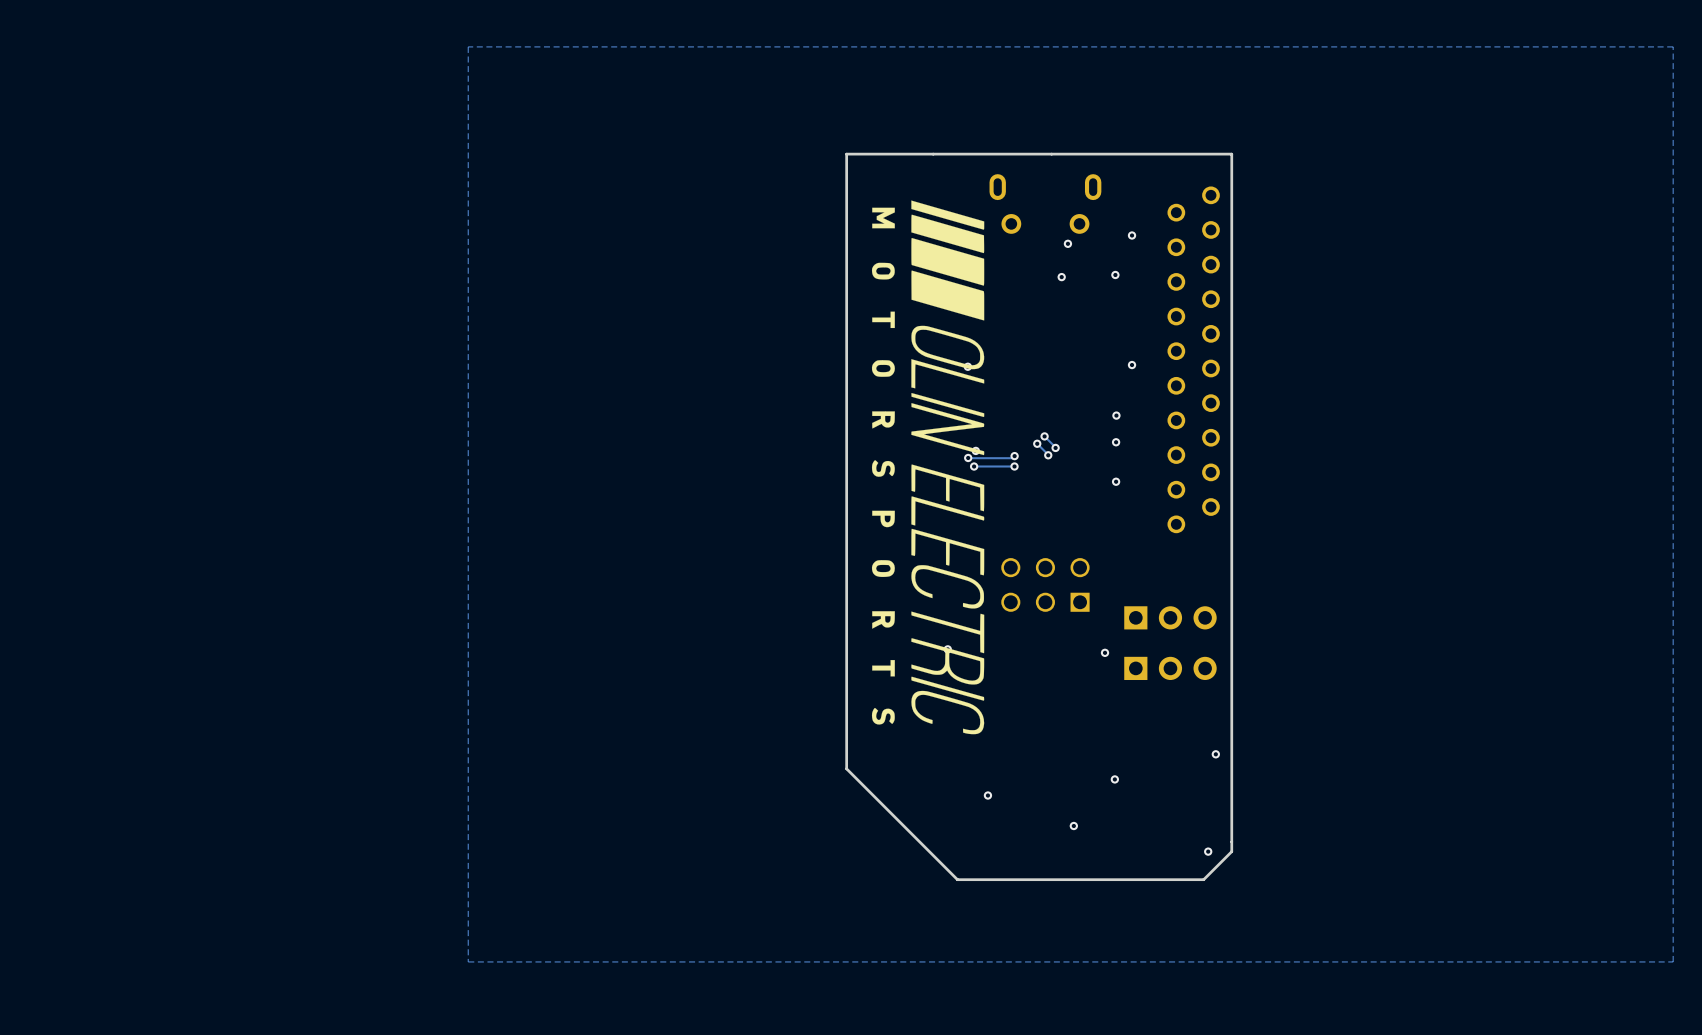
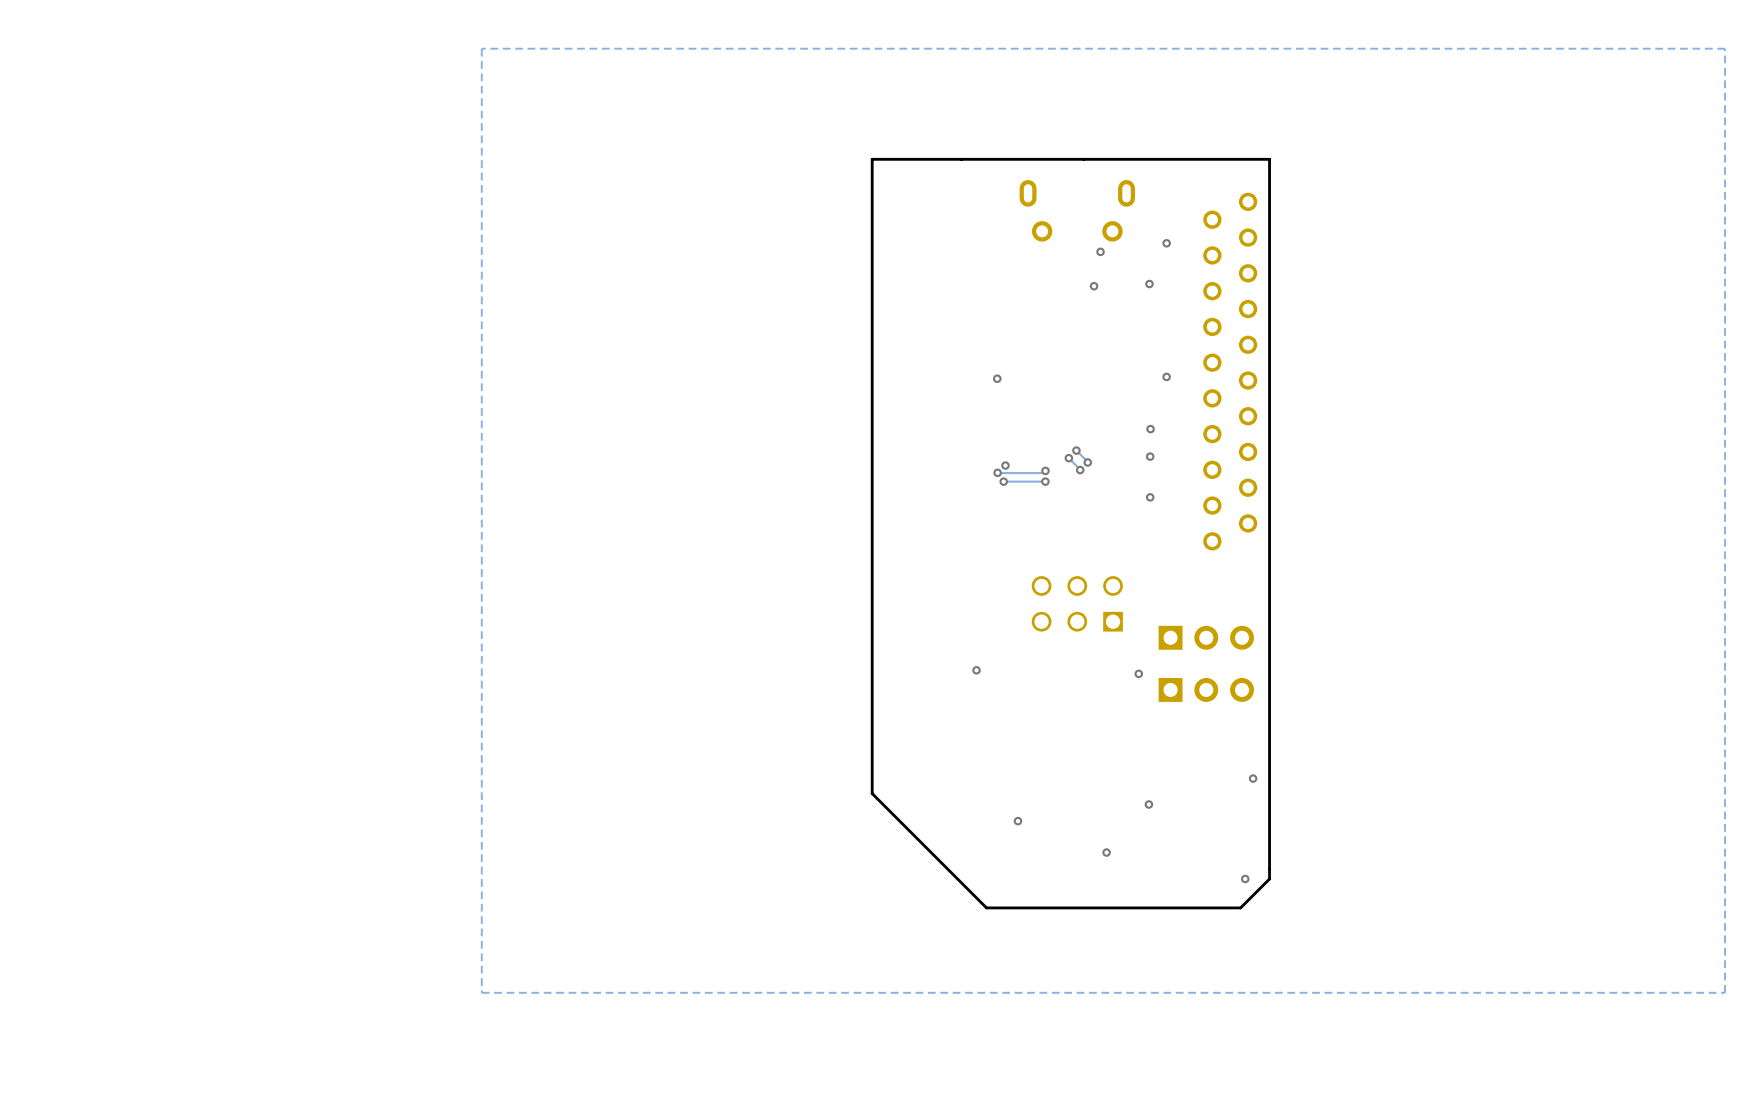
drawing: [871, 200, 985, 735] -> none

